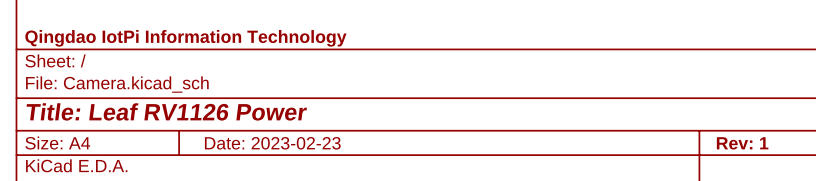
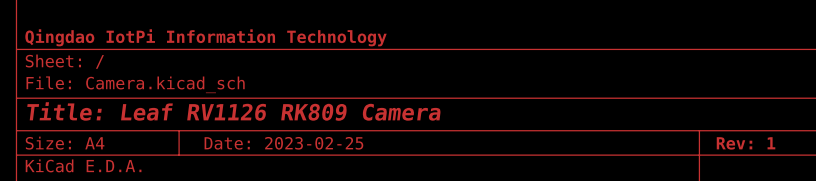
title block: Title: Leaf RV1126 Power (166, 111) -> Title: Leaf RV1126 RK809 Camera (234, 111)
title block: Date: 2023-02-23 (272, 143) -> Date: 2023-02-25 (283, 143)

